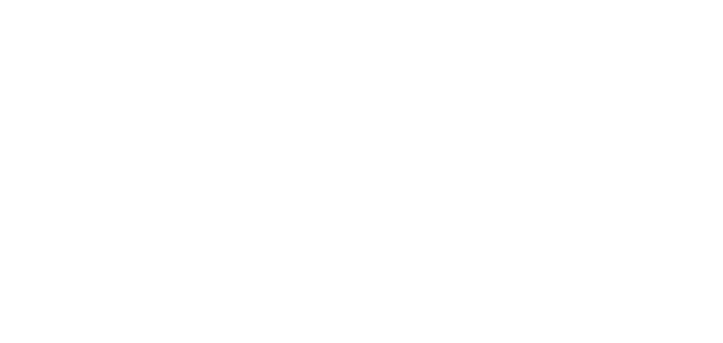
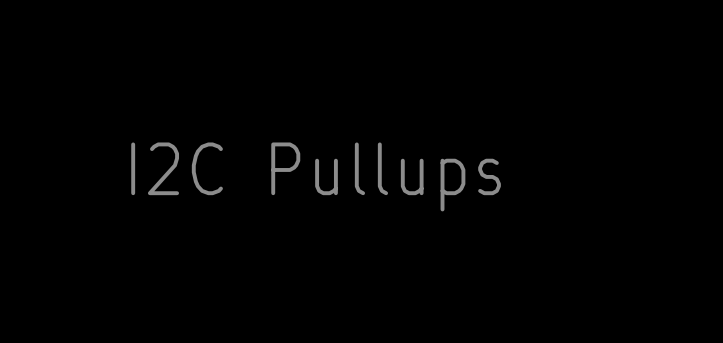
text: none -> I2C Pullups (316, 176)

